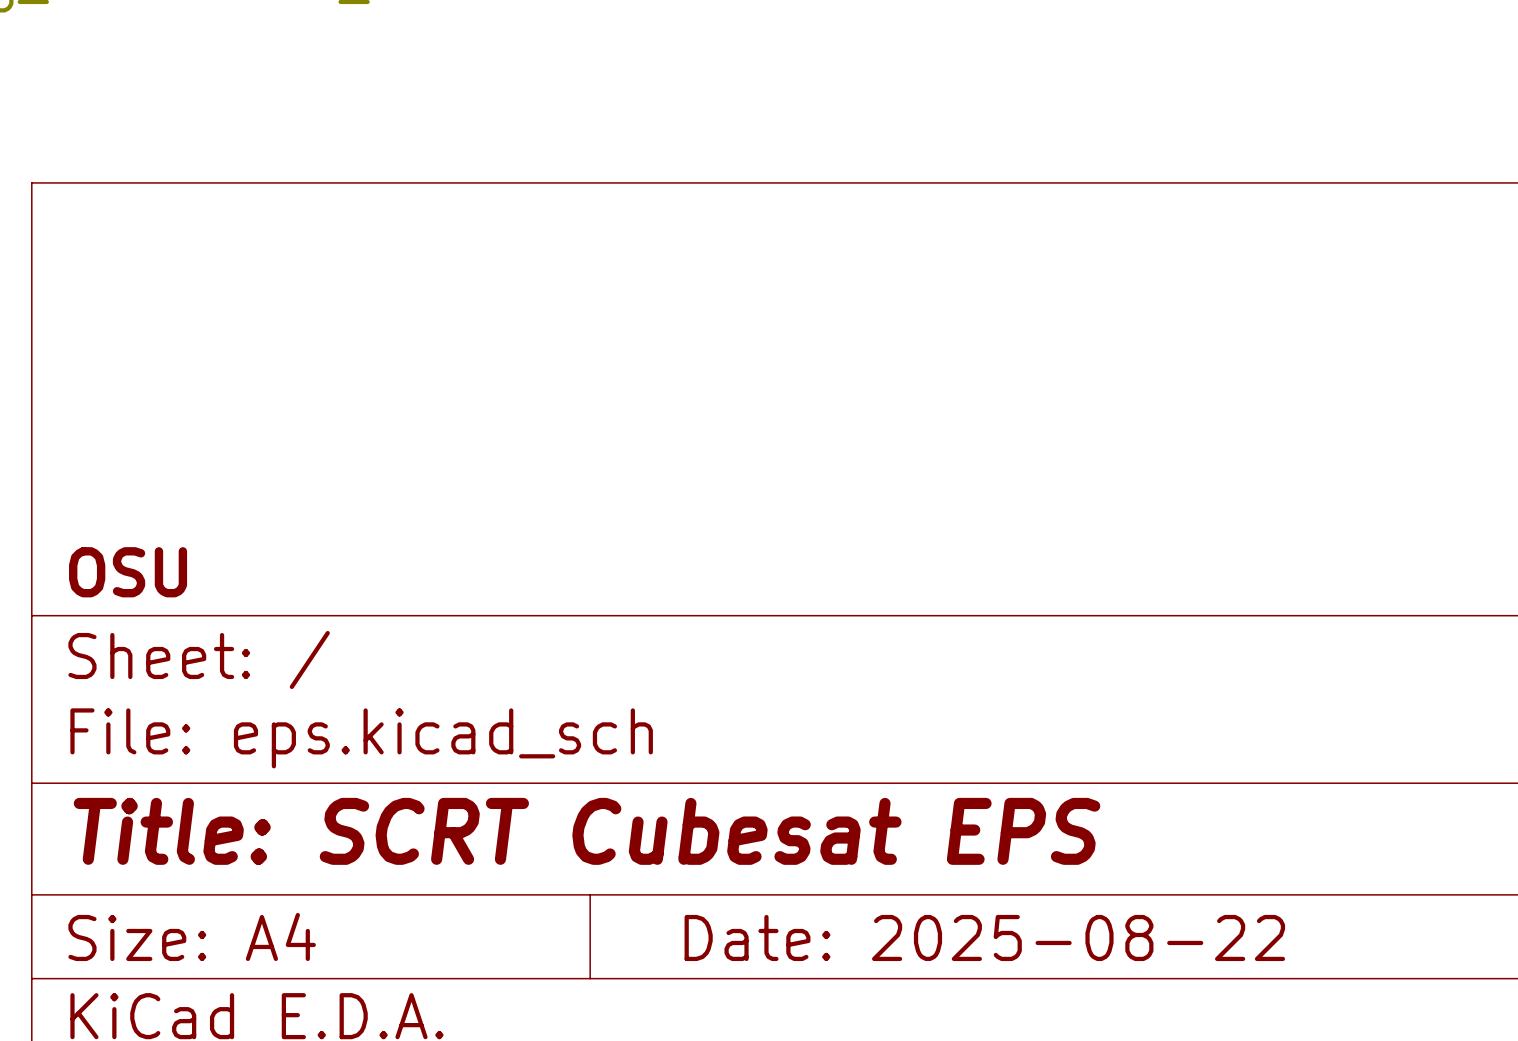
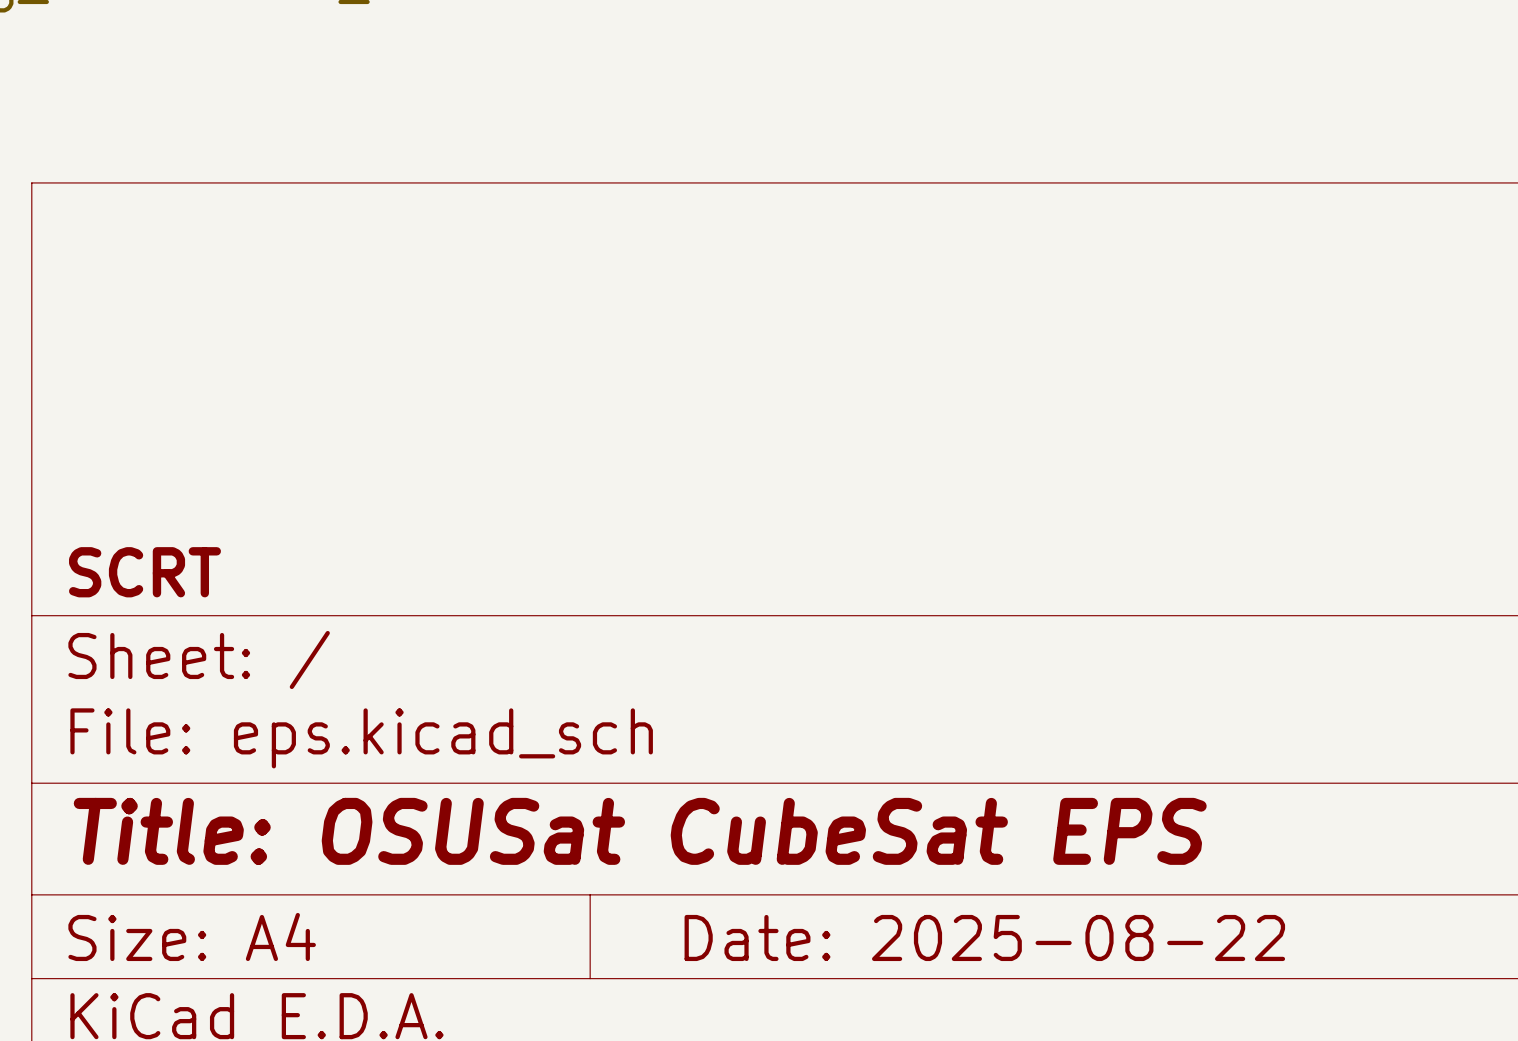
title block: OSU (128, 572) -> SCRT (144, 572)
title block: Title: SCRT Cubesat EPS (587, 831) -> Title: OSUSat CubeSat EPS (640, 831)

